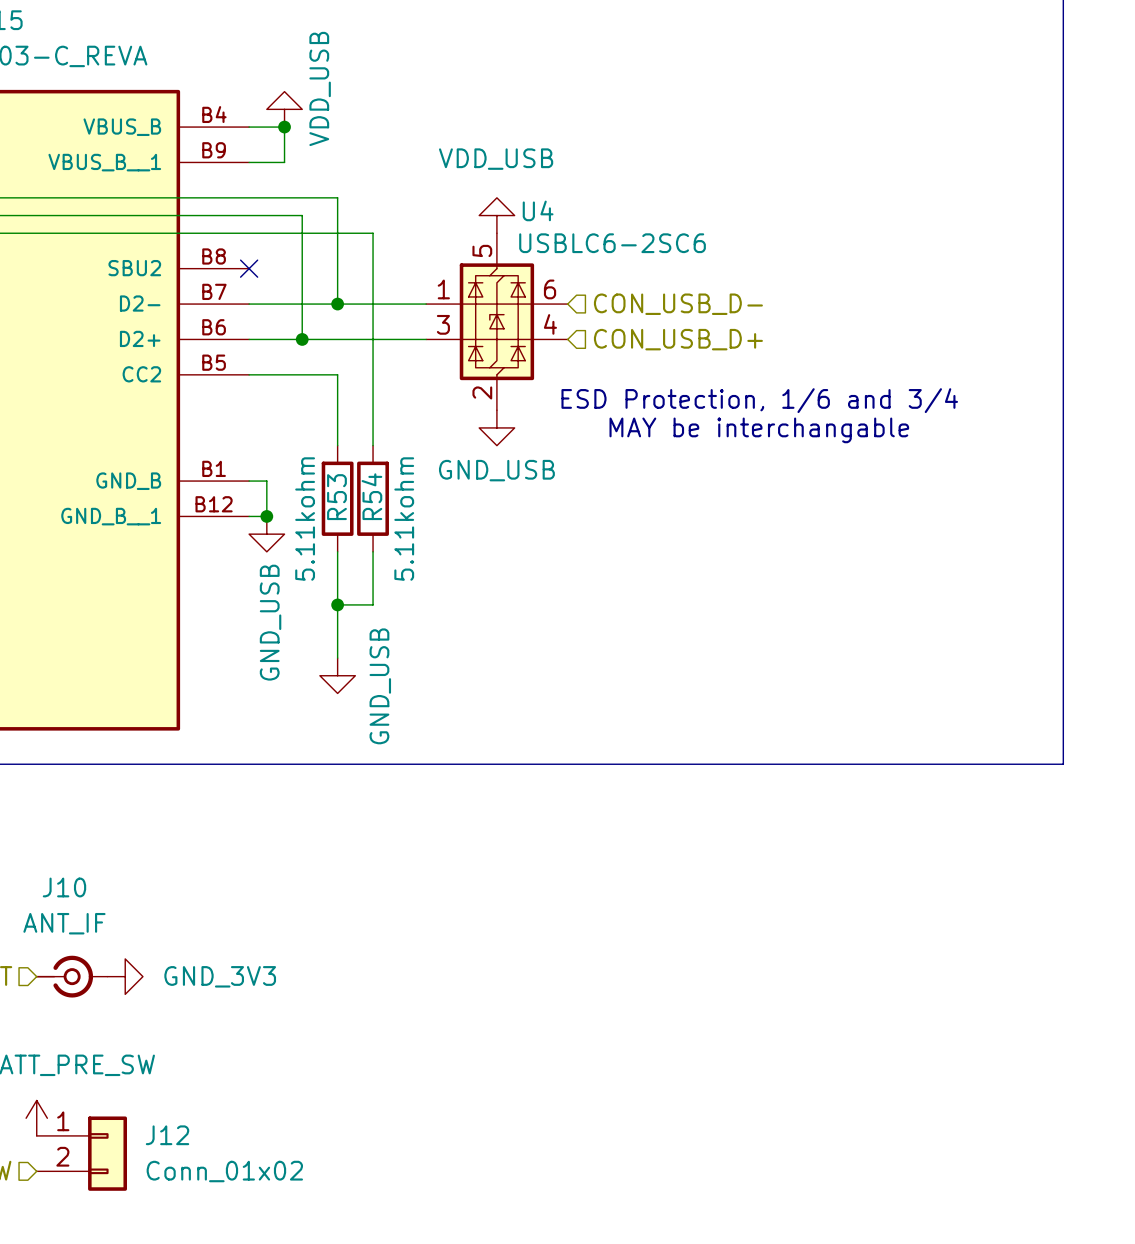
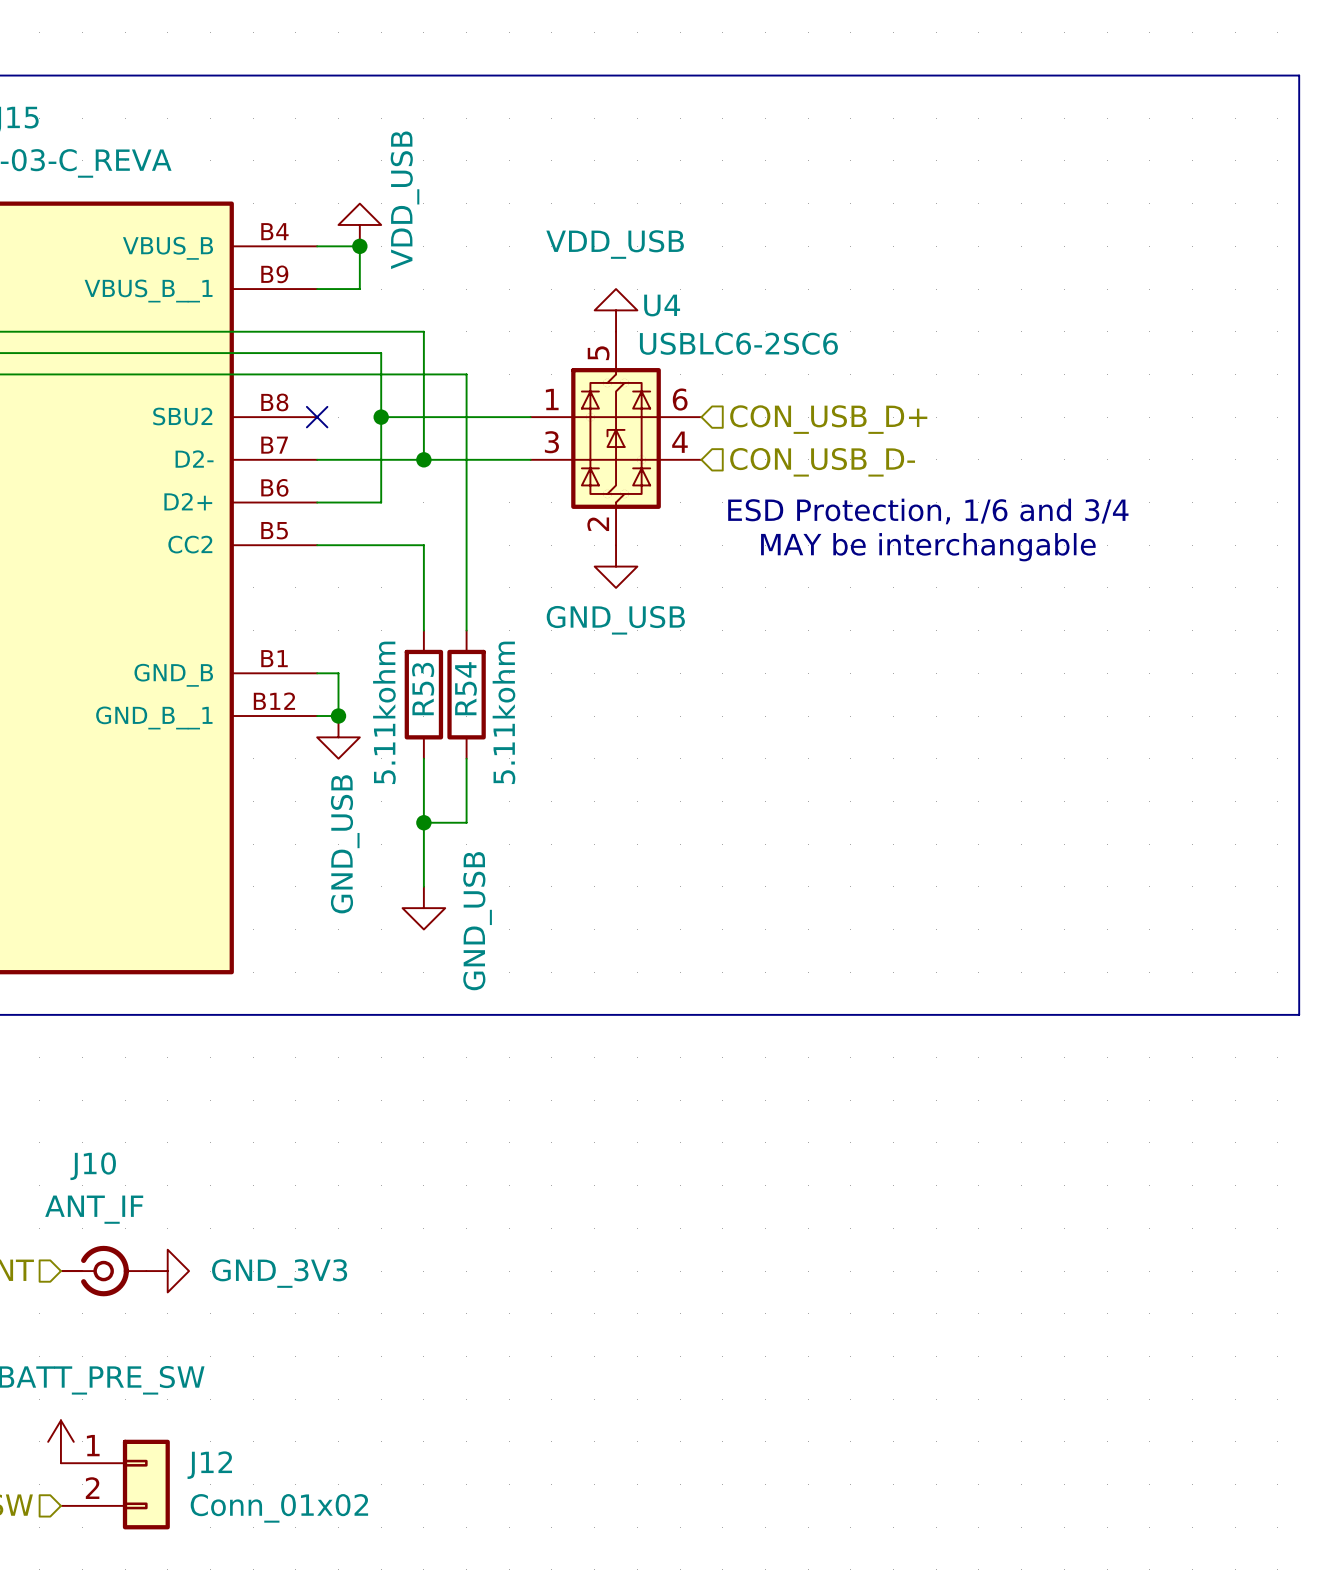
power symbol position: VDD_USB (496, 215) -> VDD_USB (616, 310)
U4 position: (496, 321) -> (616, 438)
wire: (302, 339) (426, 339) -> (381, 417) (530, 417)
junction position: (302, 339) -> (381, 417)
hierarchical label position: CON_USB_D+ (678, 339) -> CON_USB_D+ (828, 419)
text position: ESD Protection, 1/6 and 3/4 (759, 400) -> ESD Protection, 1/6 and 3/4 (928, 511)
power symbol position: GND_USB (496, 427) -> GND_USB (616, 566)
text position: MAY be interchangable (759, 430) -> MAY be interchangable (928, 547)

